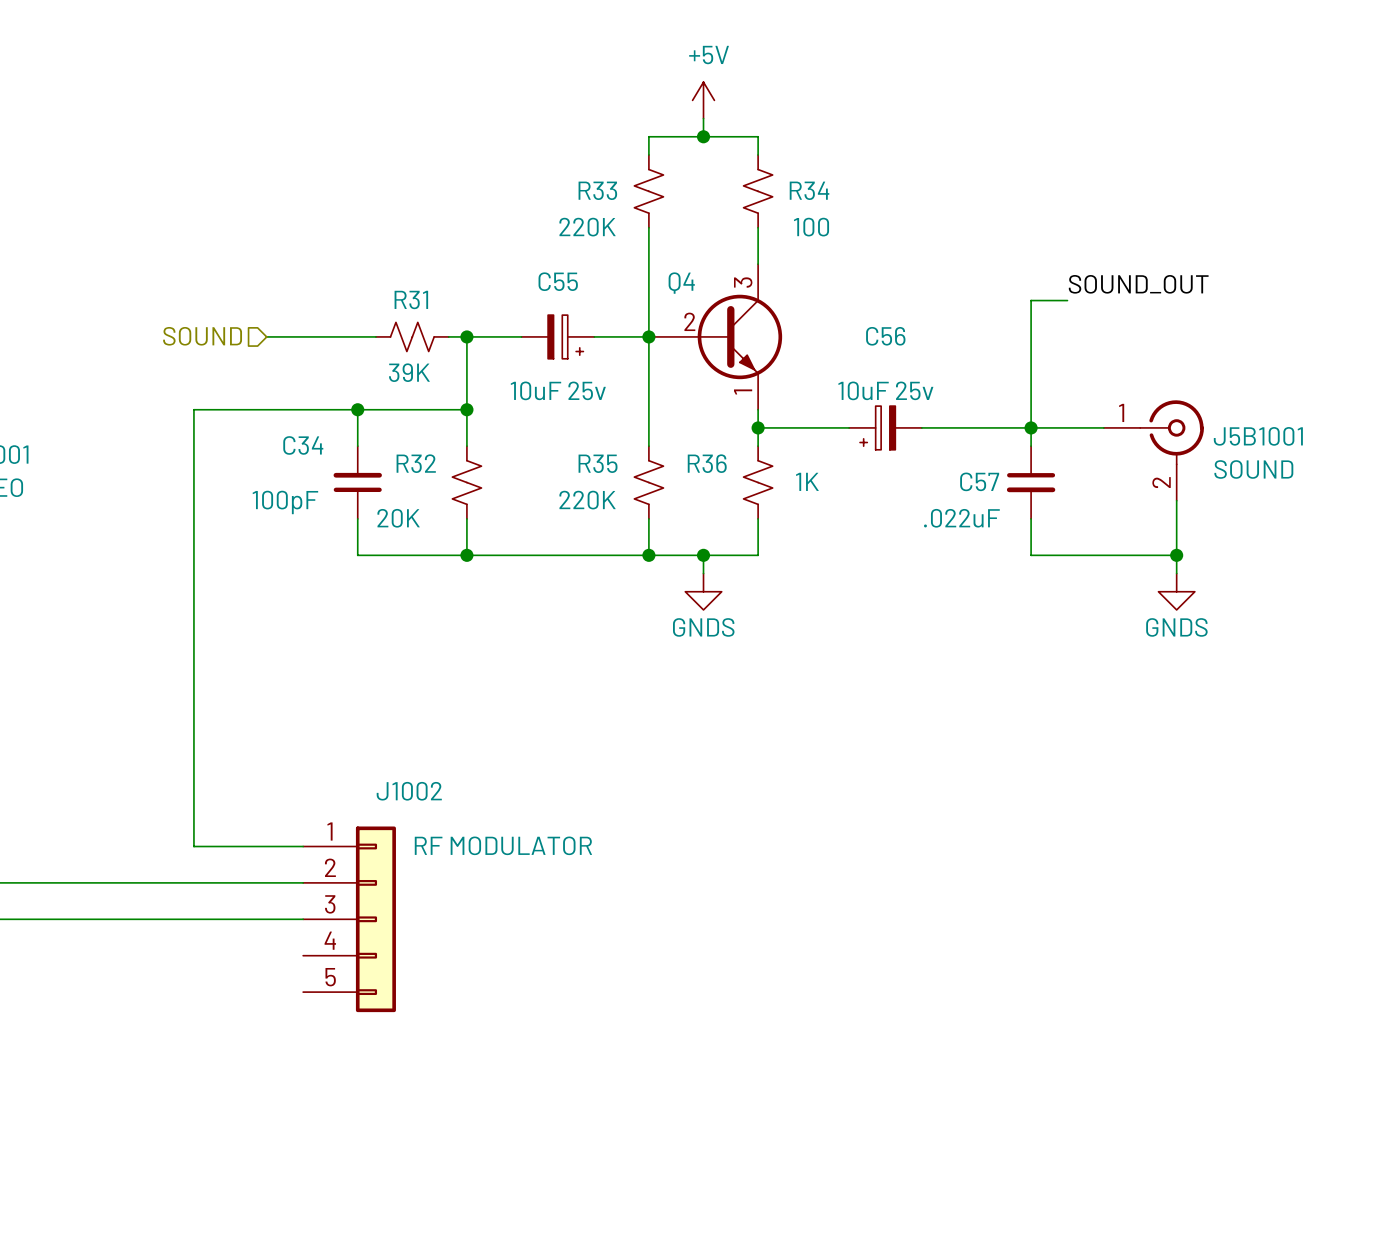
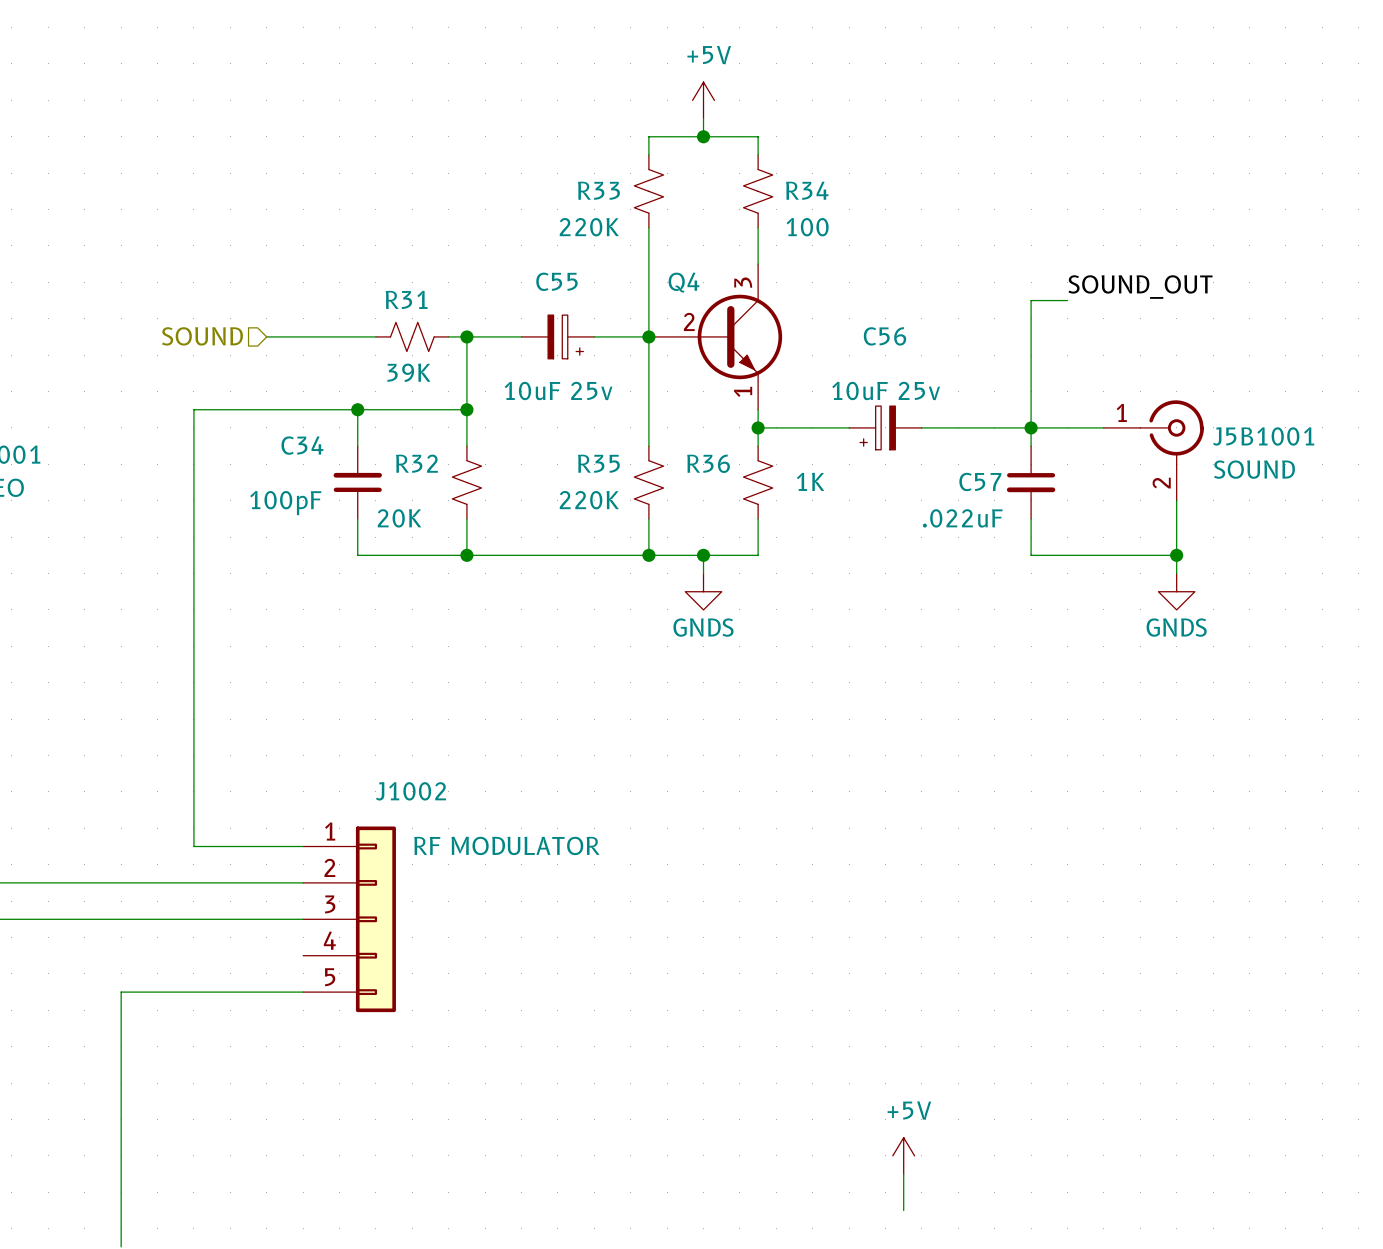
wire: none -> (303, 992) (121, 992) (121, 1246)
power symbol: none -> +5V (903, 1155)
wire: none -> (903, 1174) (903, 1210)

